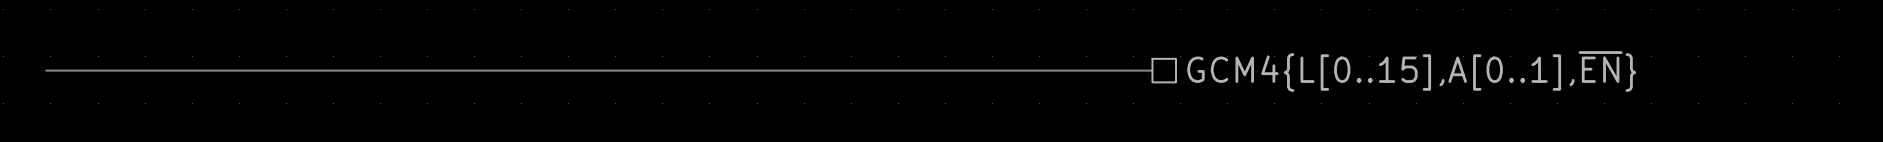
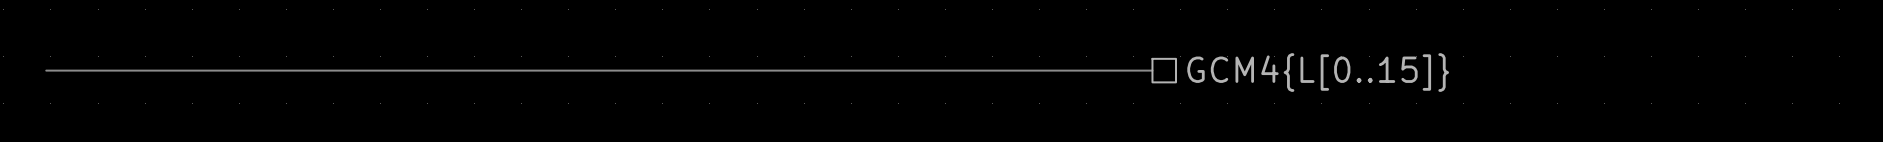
hierarchical label: GCM4{L[0..15],A[0..1],~{EN}} (1411, 71) -> GCM4{L[0..15]} (1318, 72)

